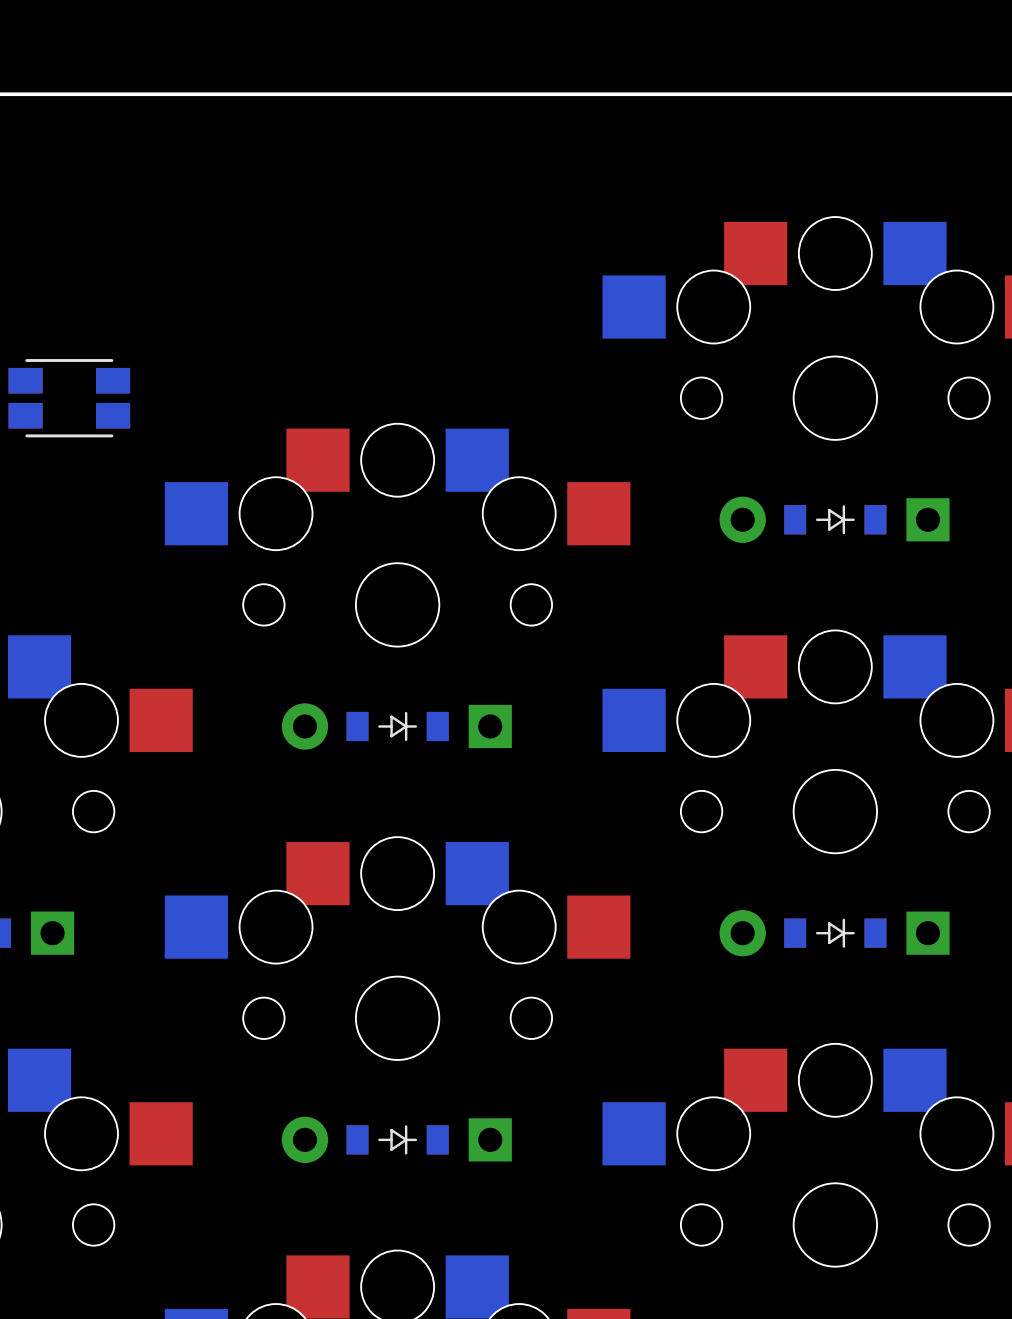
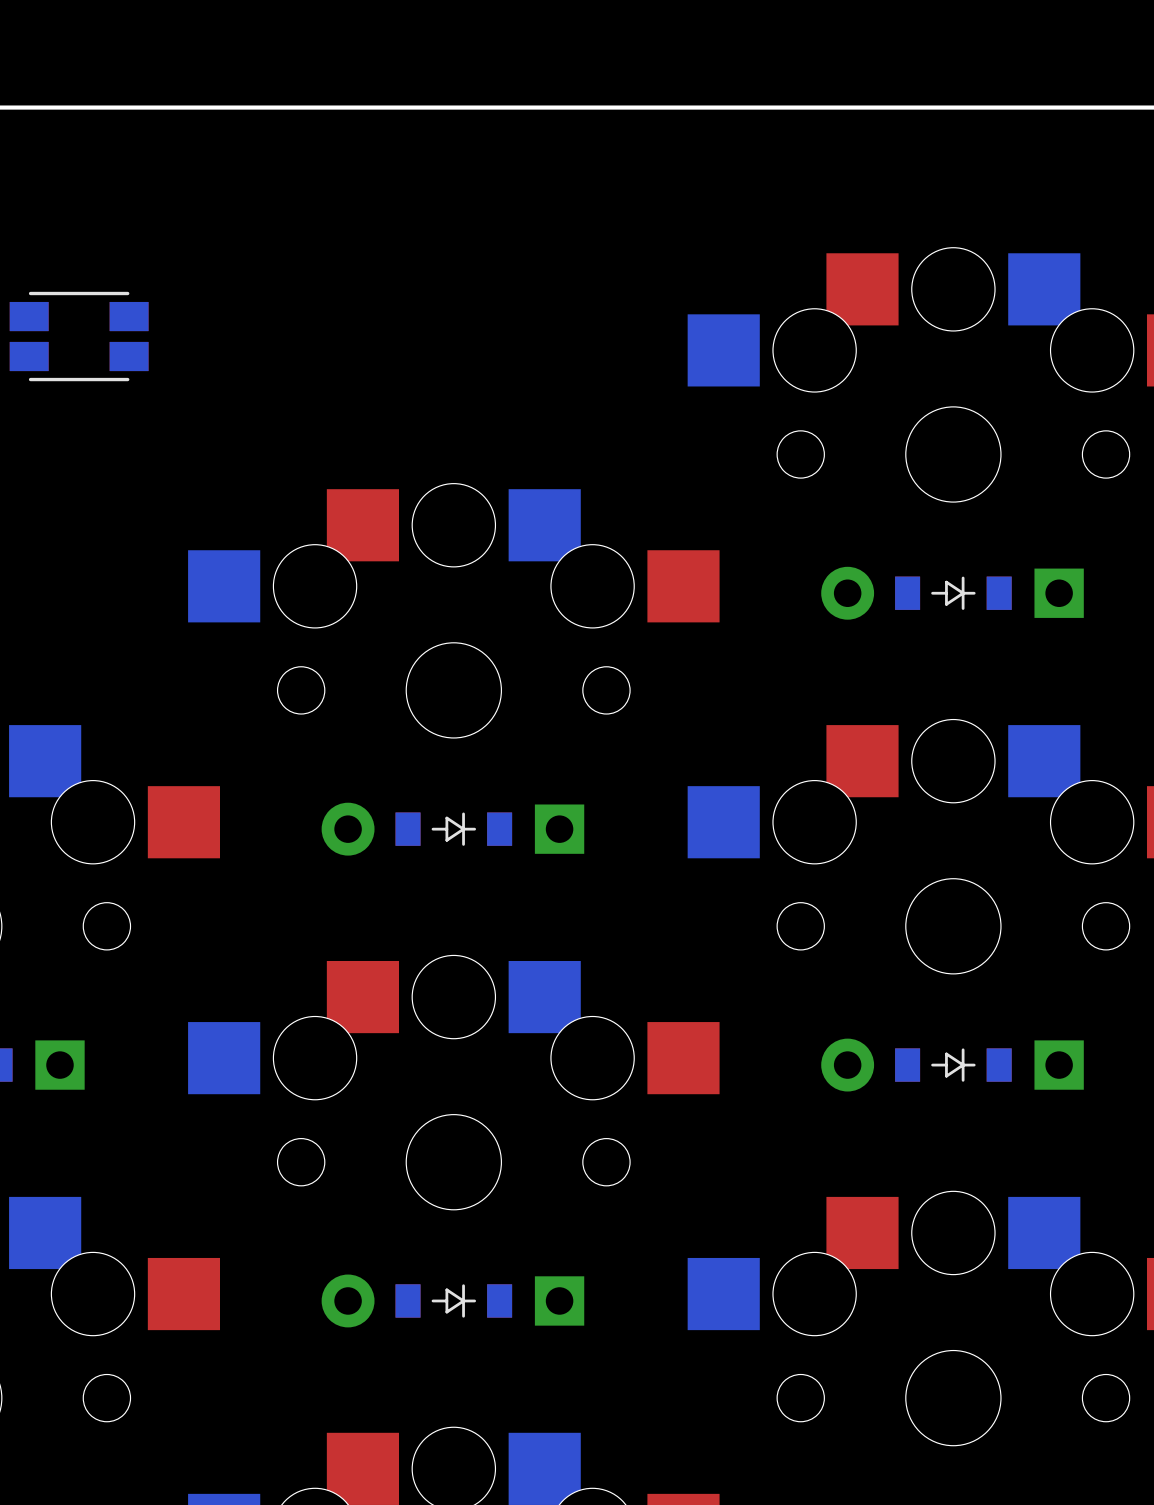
part position: (69, 398) -> (79, 336)

